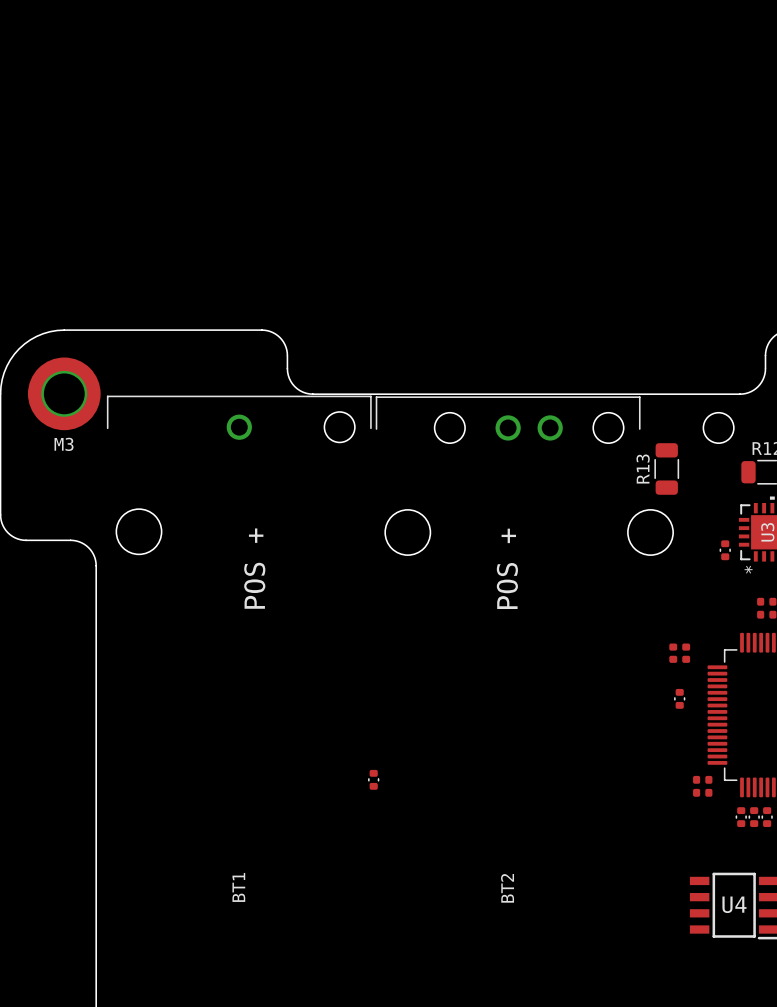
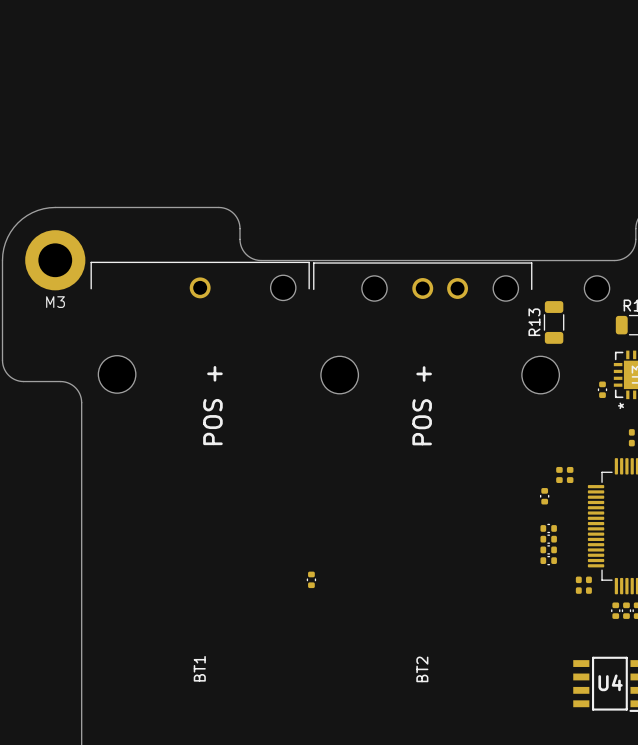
part: none -> (544, 496)
part: (679, 698) -> none
part: none -> (548, 528)
part: none -> (548, 539)
part: none -> (548, 549)
part: none -> (548, 560)

